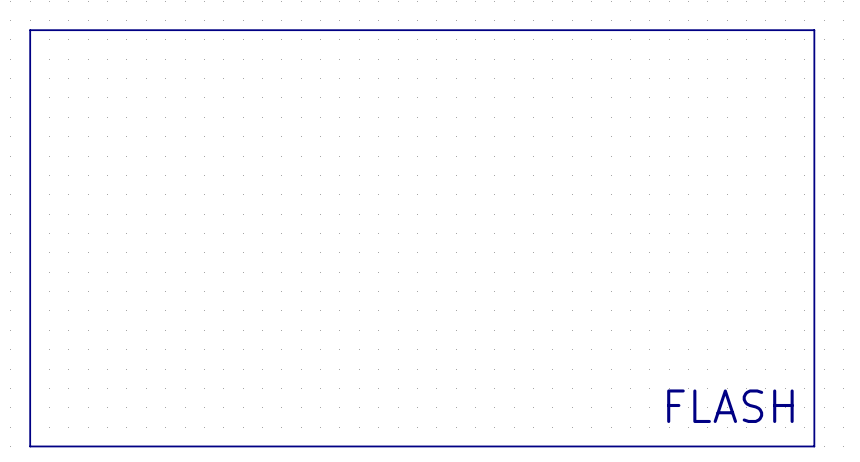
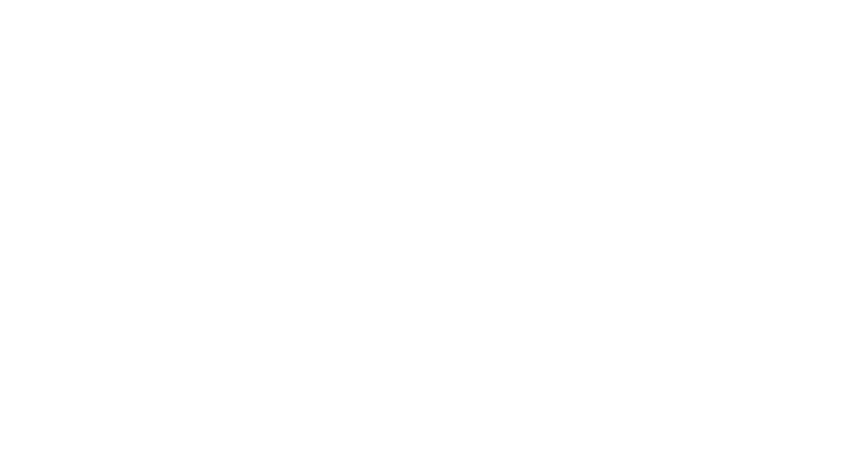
line: (30, 30) (814, 30) (814, 446) (30, 446) (30, 30) -> none
text: FLASH (730, 406) -> none

